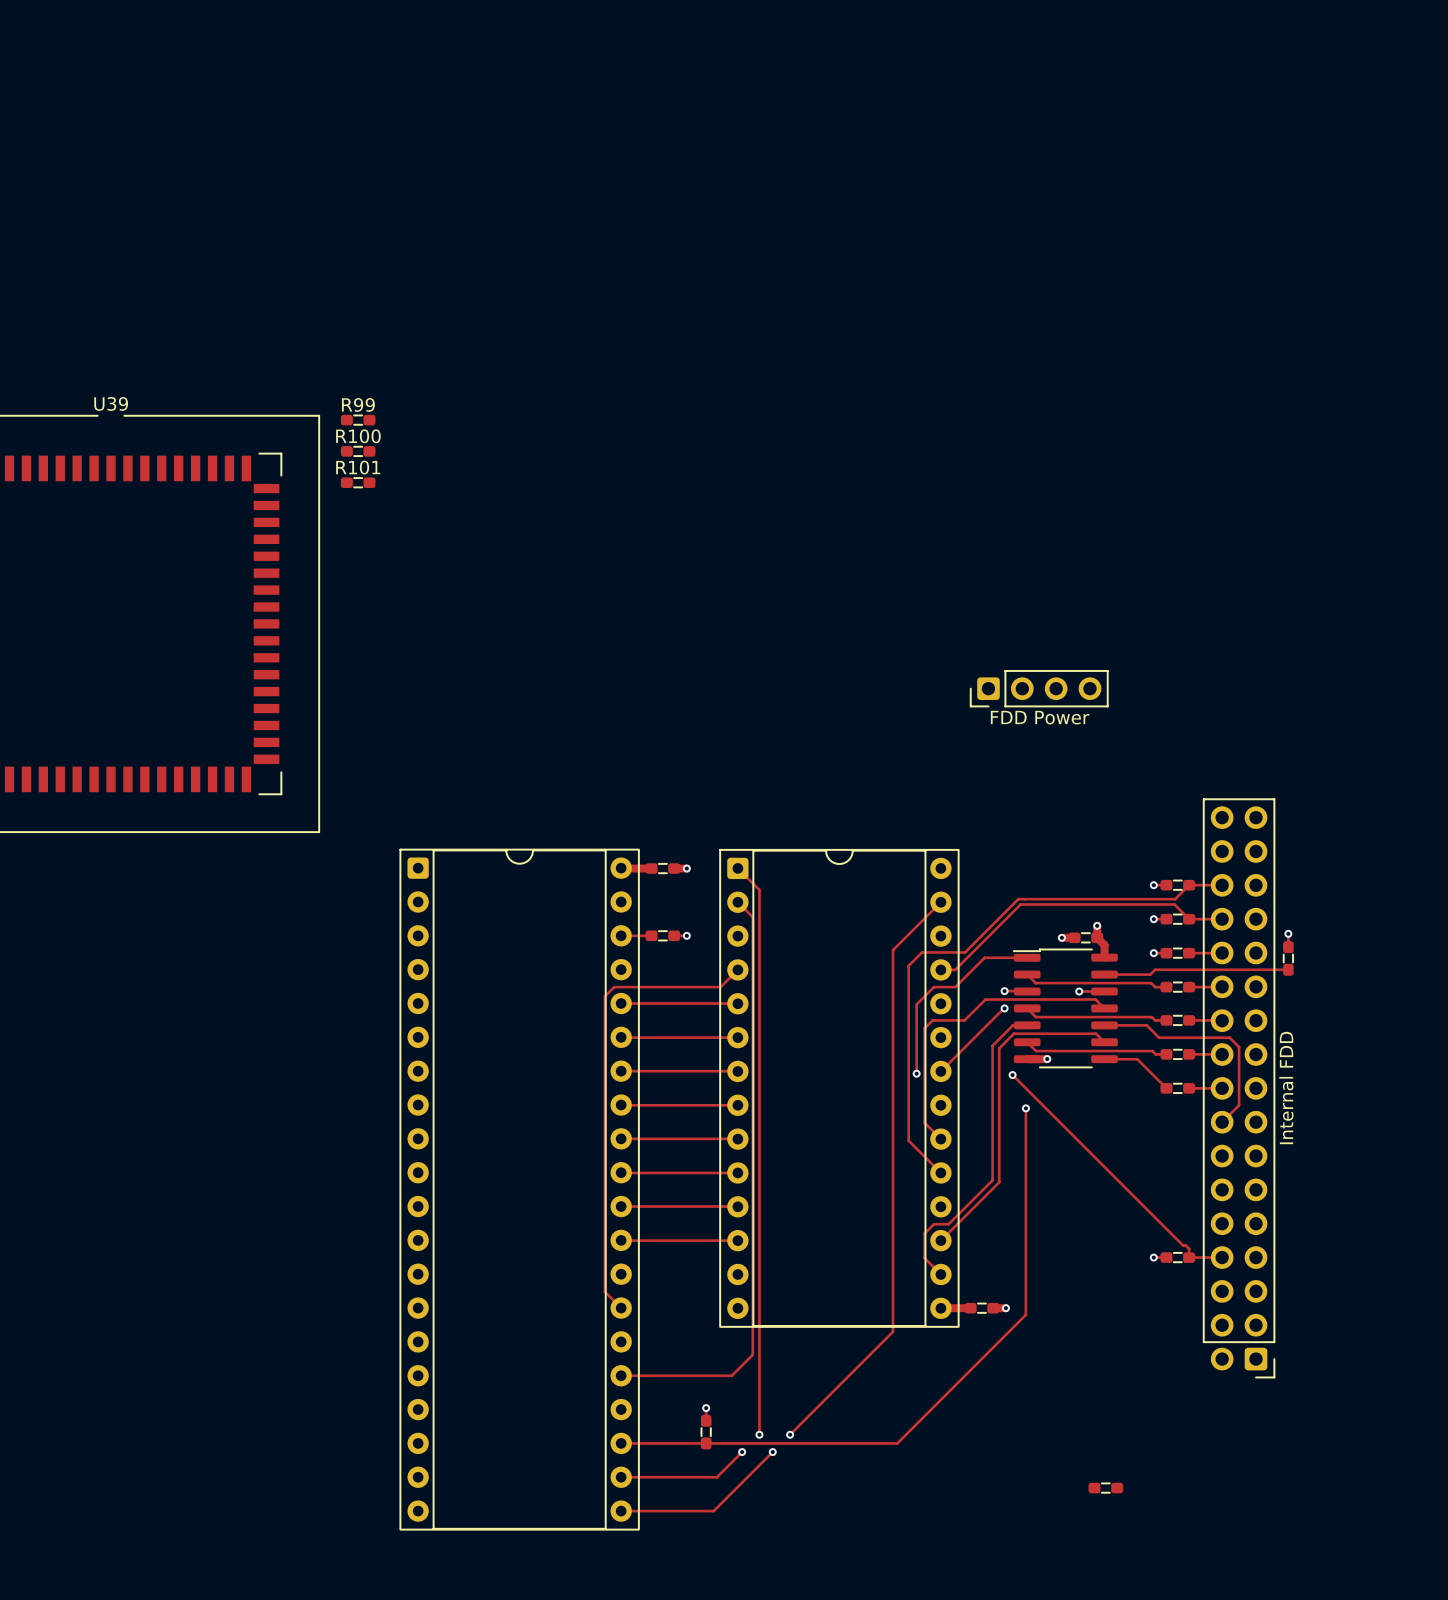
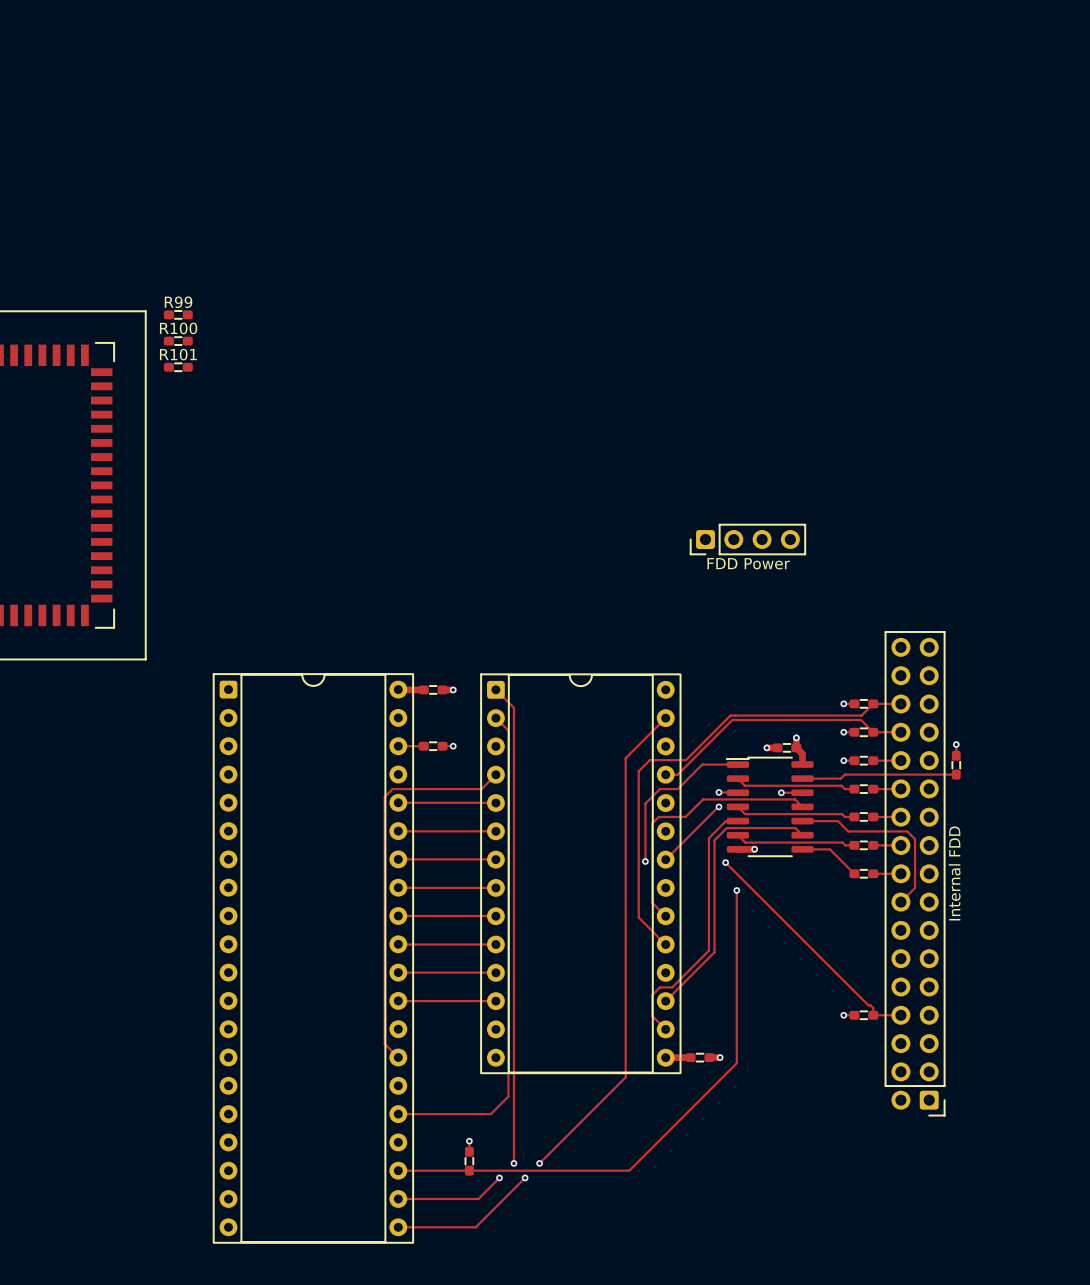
part: (1105, 1488) -> none

